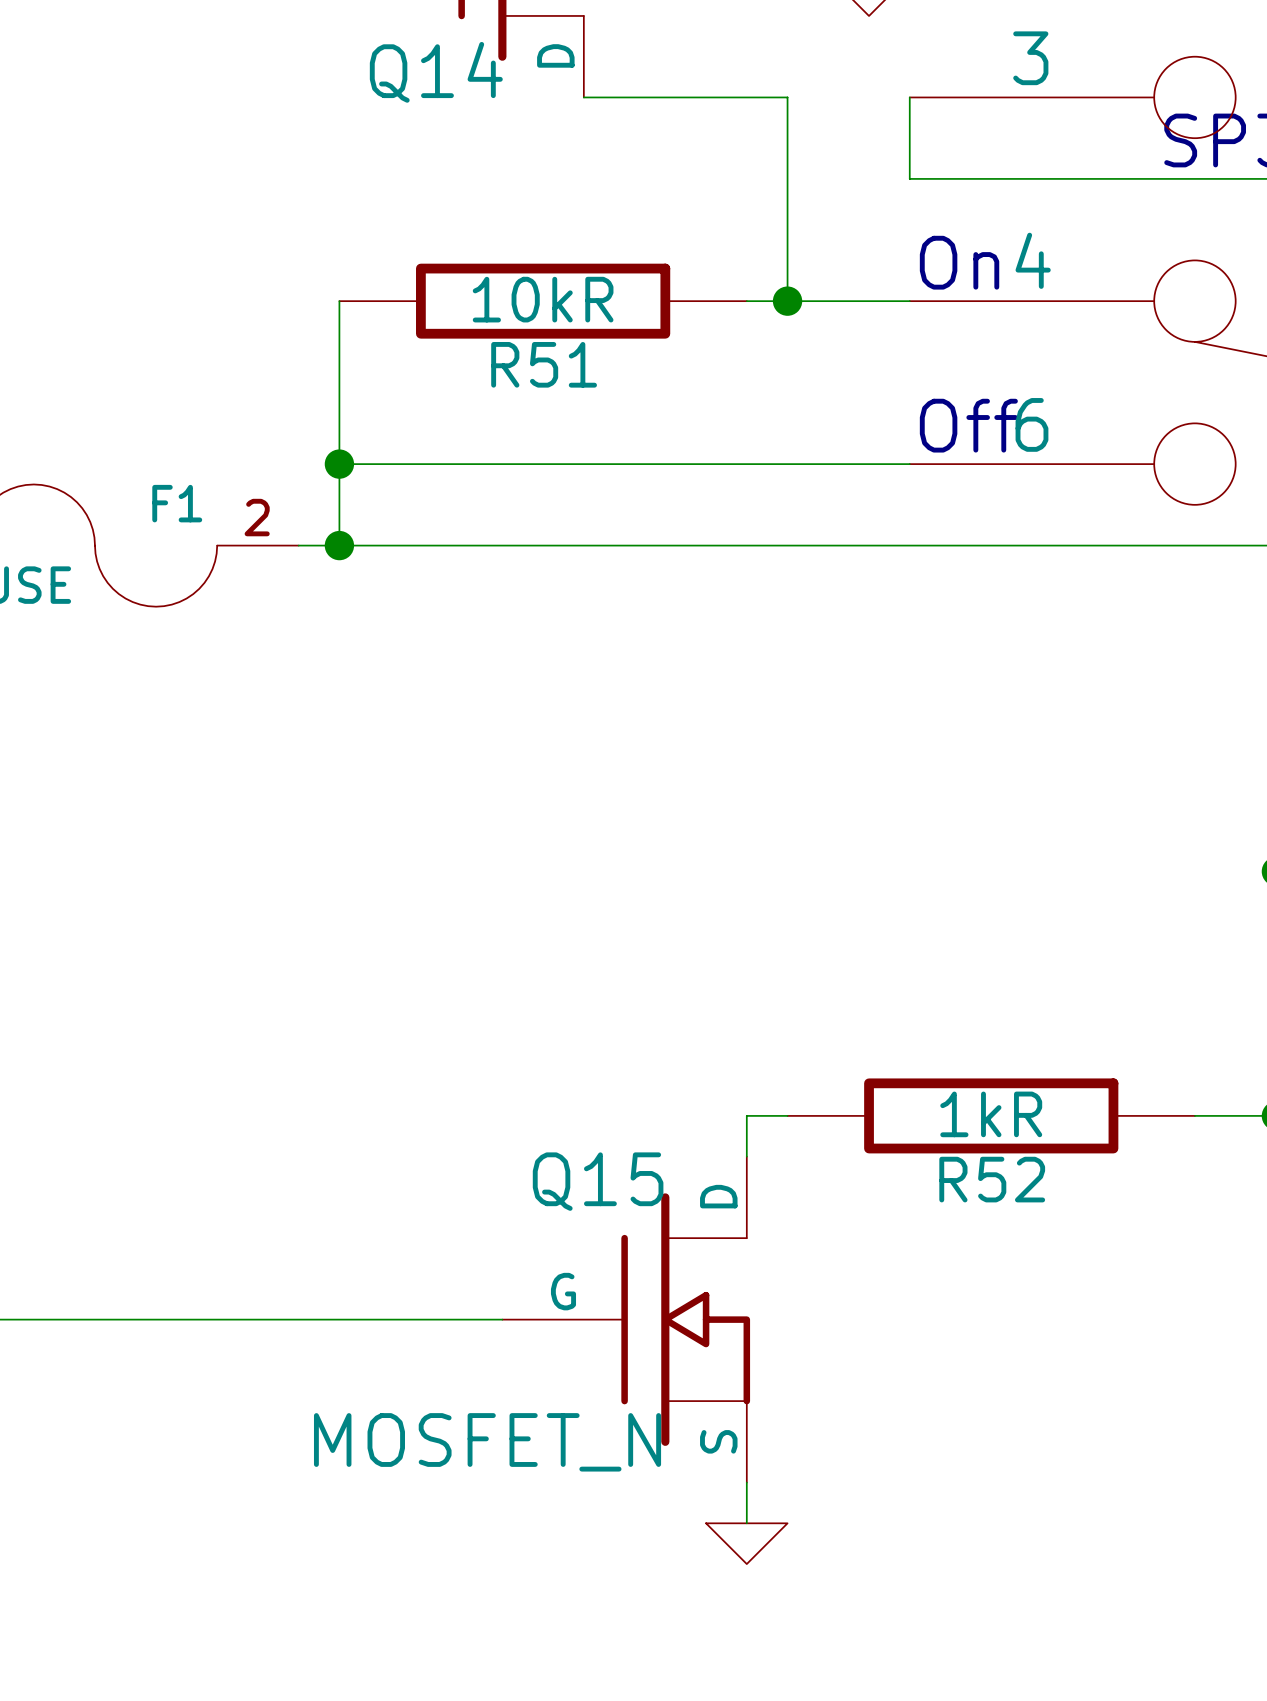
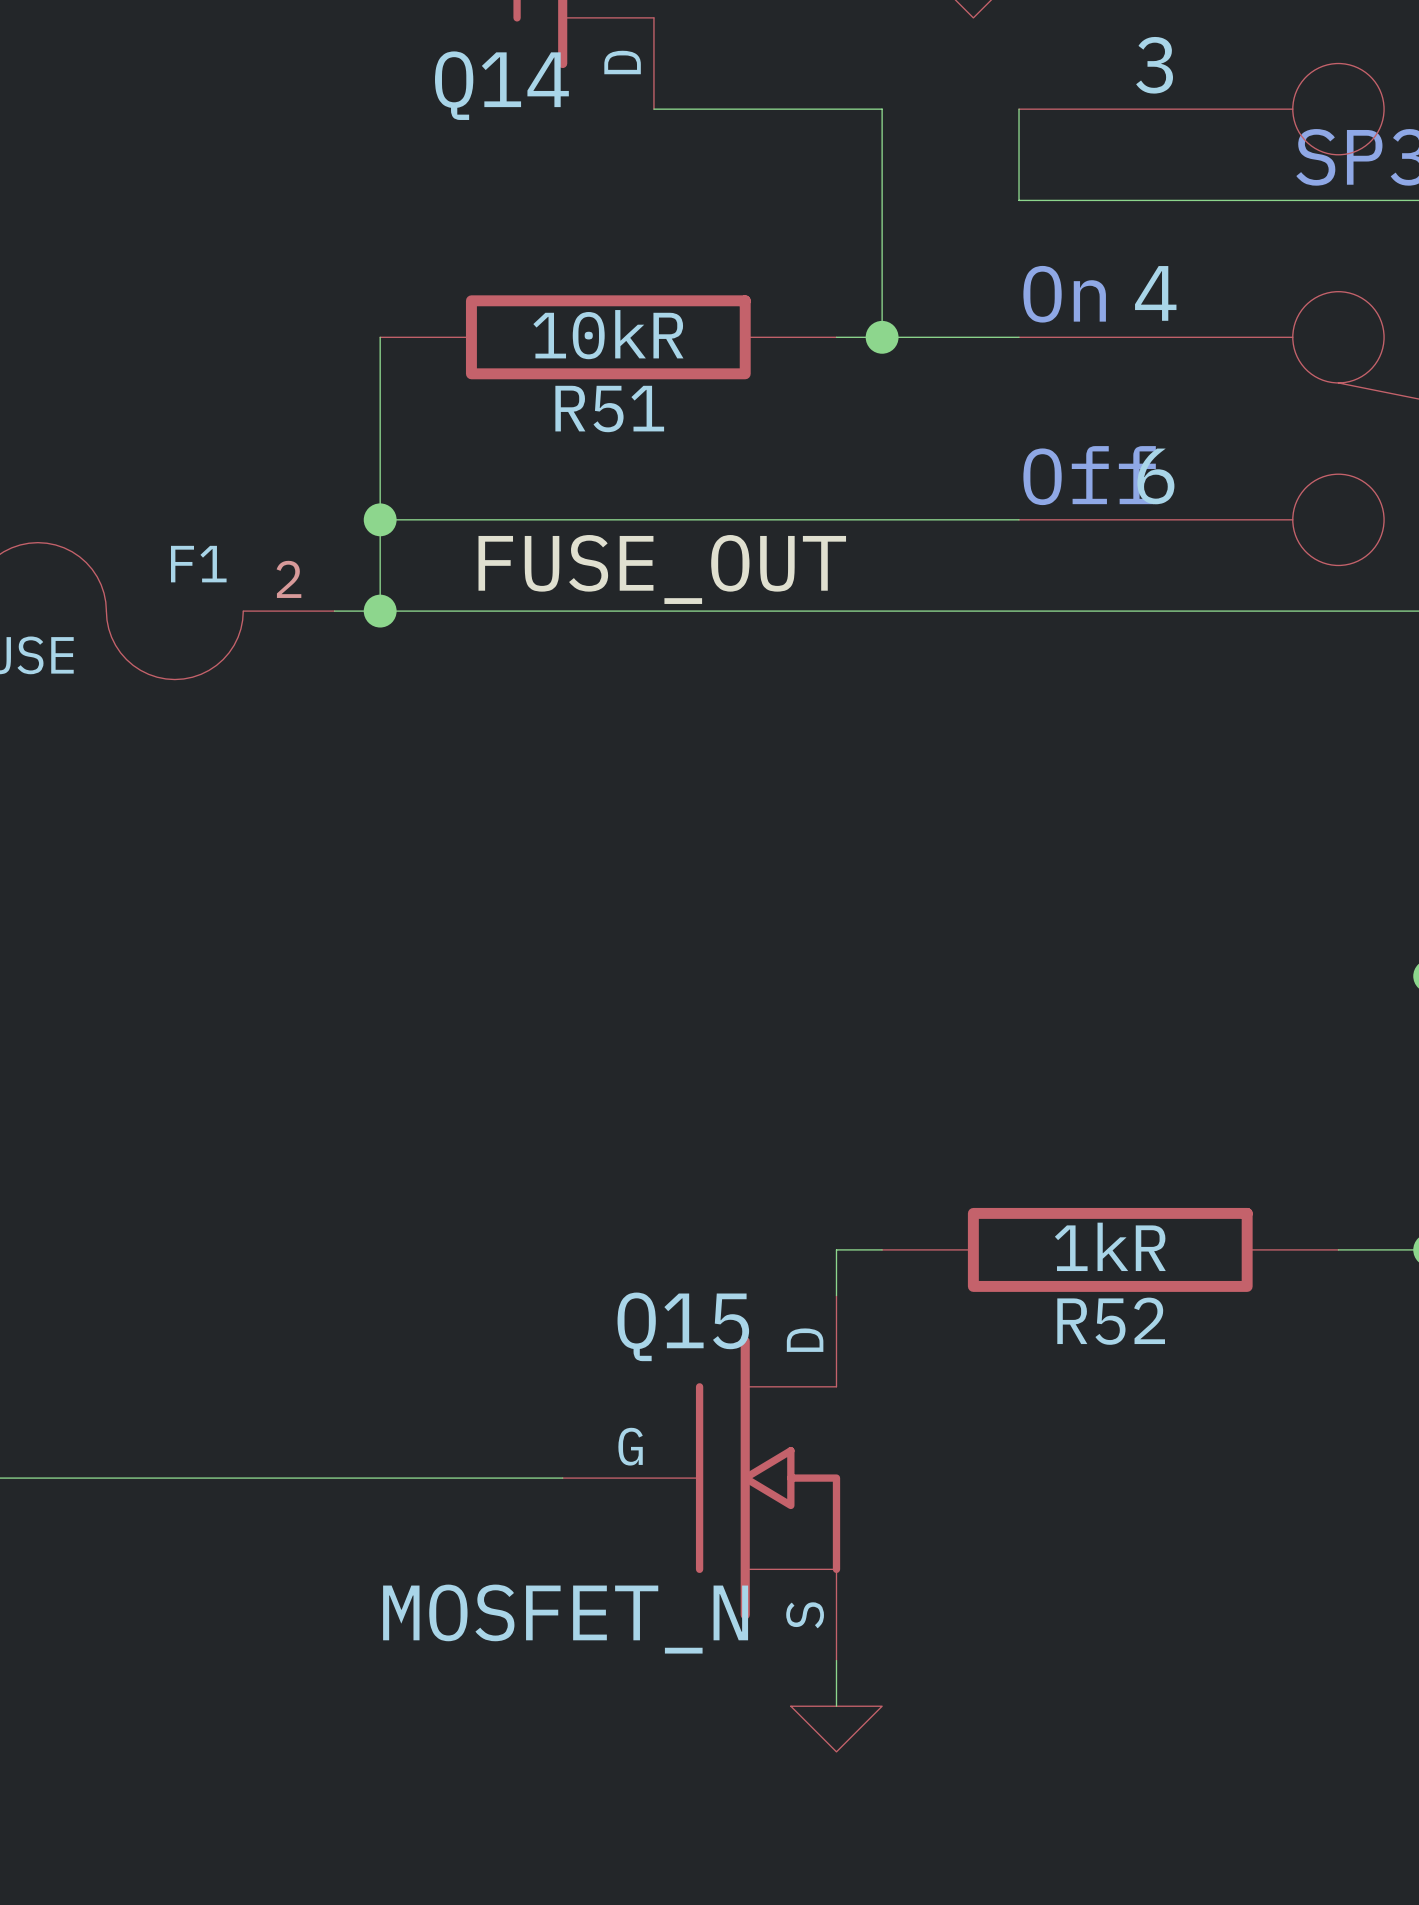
label: none -> FUSE_OUT (662, 569)

